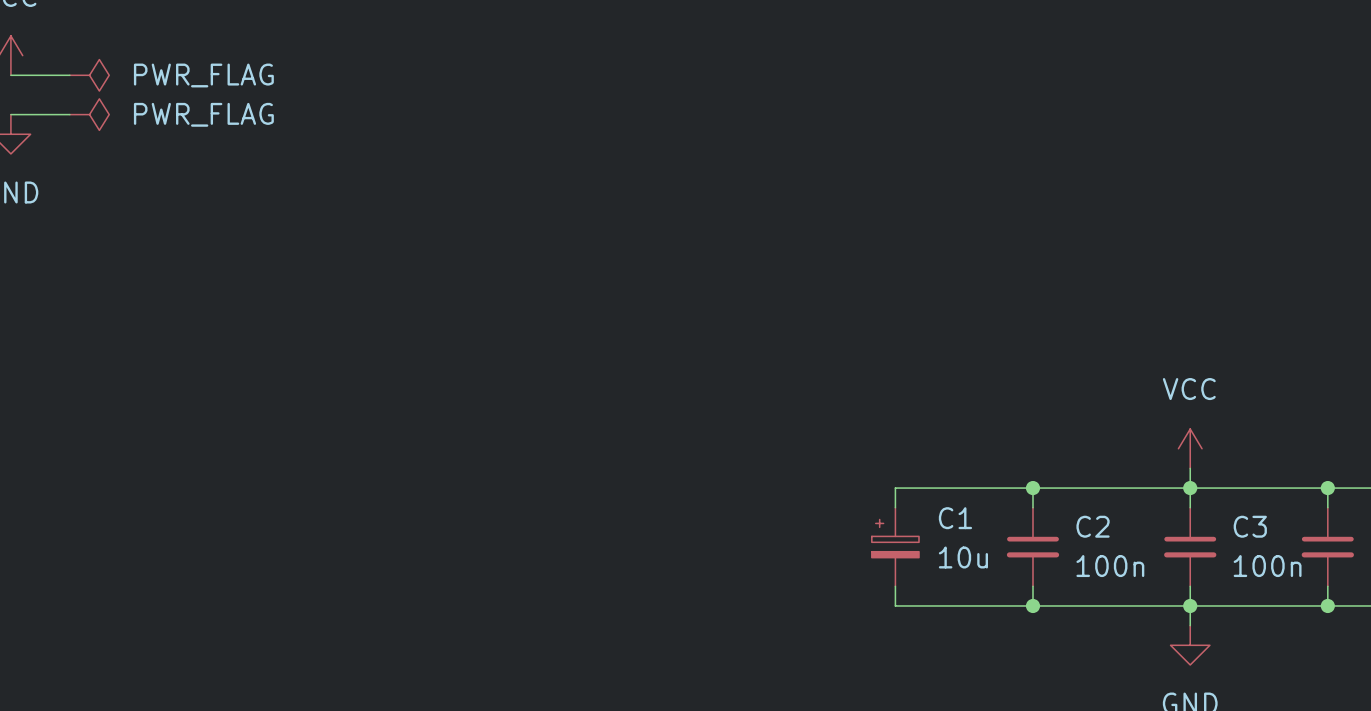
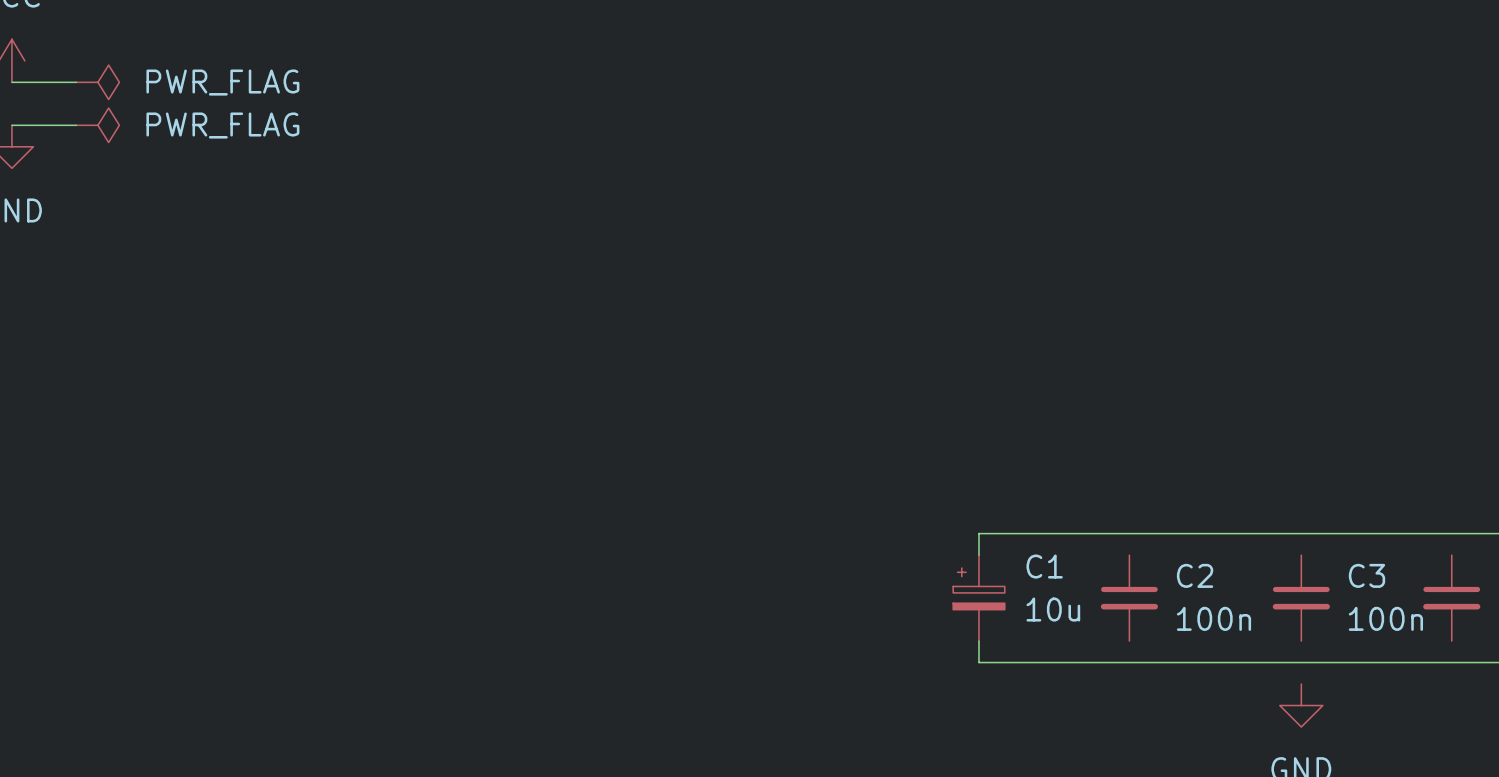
power symbol: VCC (1190, 448) -> none
wire: (1190, 468) (1190, 507) -> none
wire: (1032, 488) (1032, 507) -> none
junction: (1032, 488) -> none
junction: (1190, 488) -> none
wire: (1327, 488) (1327, 507) -> none
junction: (1327, 488) -> none
wire: (1032, 586) (1032, 605) -> none
wire: (1190, 586) (1190, 625) -> none
wire: (1327, 586) (1327, 605) -> none
junction: (1032, 605) -> none
junction: (1190, 605) -> none
junction: (1327, 605) -> none

